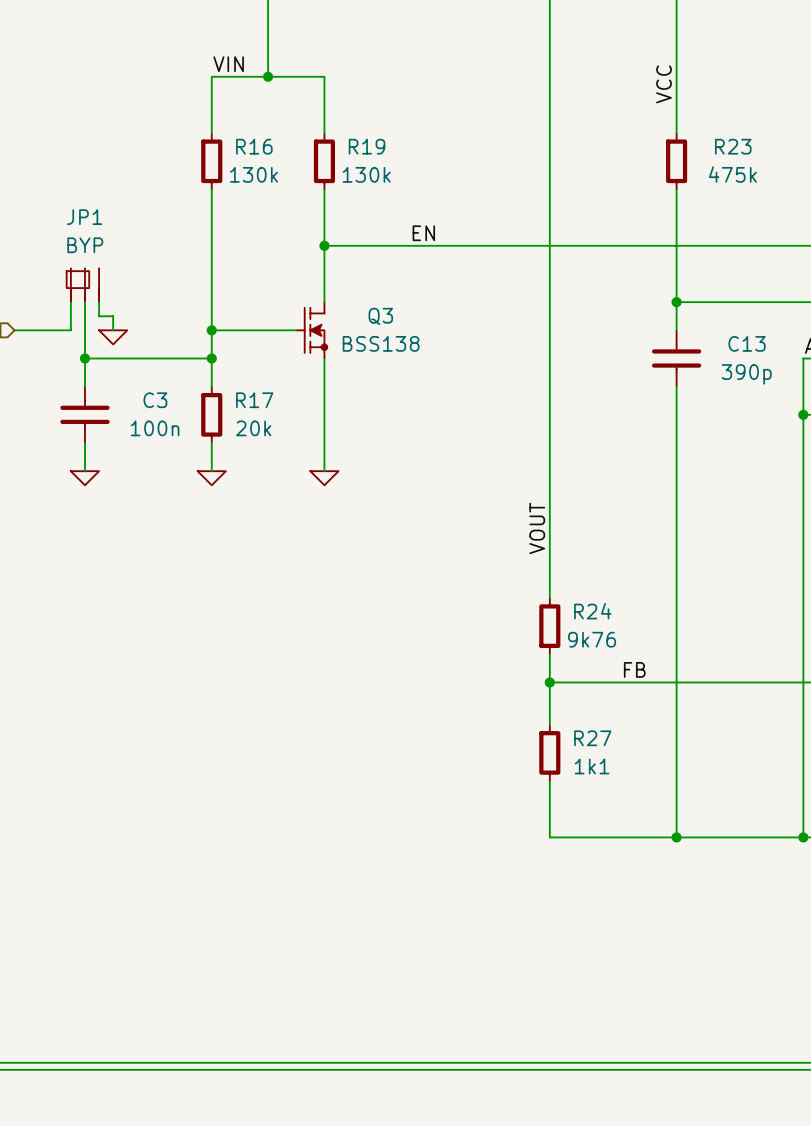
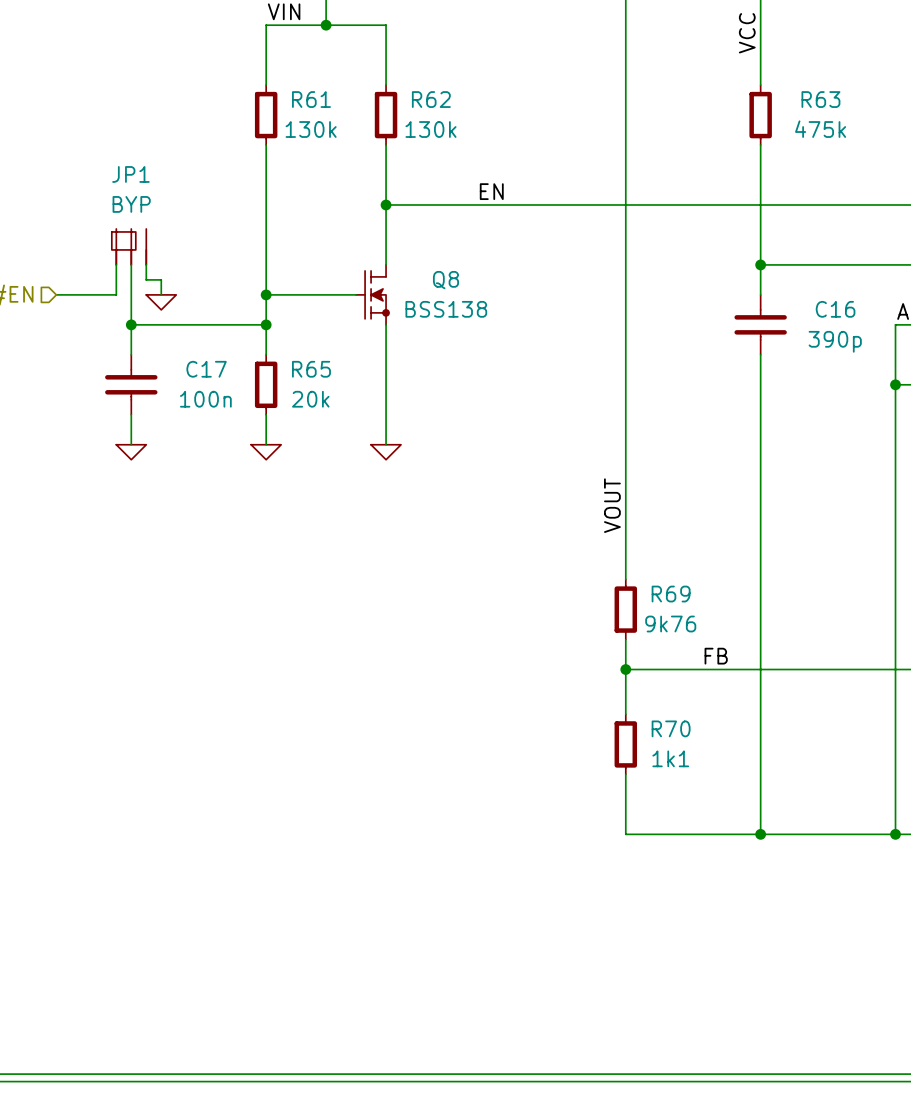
R16 name: R16 (254, 146) -> R61 (311, 99)
R19 name: R19 (367, 146) -> R62 (431, 99)
R23 name: R23 (733, 146) -> R63 (820, 99)
Q3 name: Q3 (380, 316) -> Q8 (445, 280)
C13 name: C13 (747, 343) -> C16 (835, 309)
C3 name: C3 (155, 400) -> C17 (206, 369)
R17 name: R17 (254, 400) -> R65 (311, 369)
R24 name: R24 (592, 611) -> R69 (671, 594)
R27 name: R27 (592, 738) -> R70 (671, 728)

